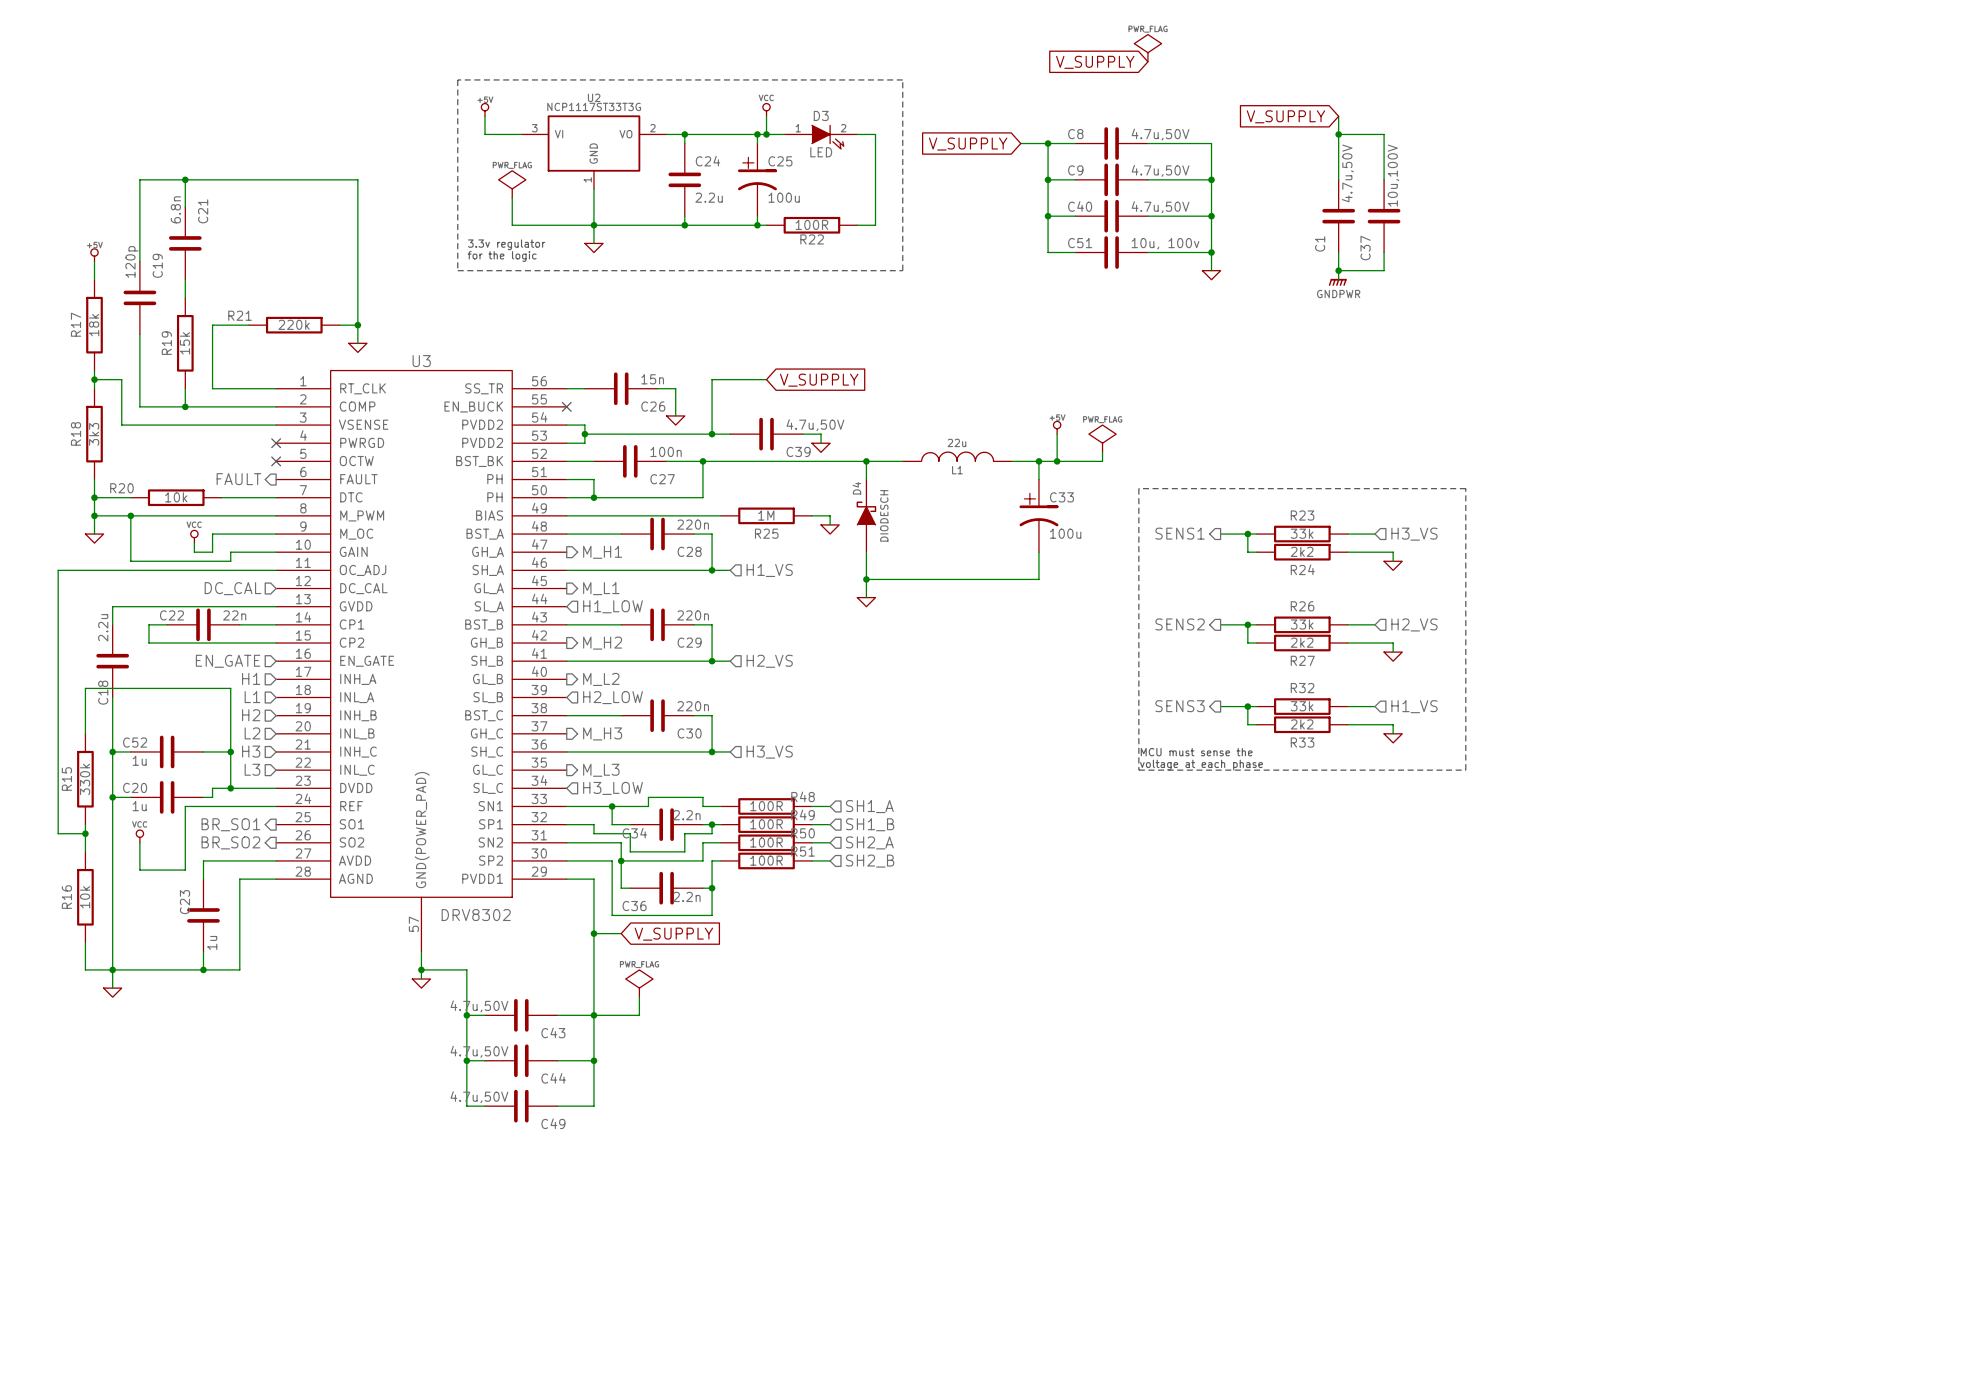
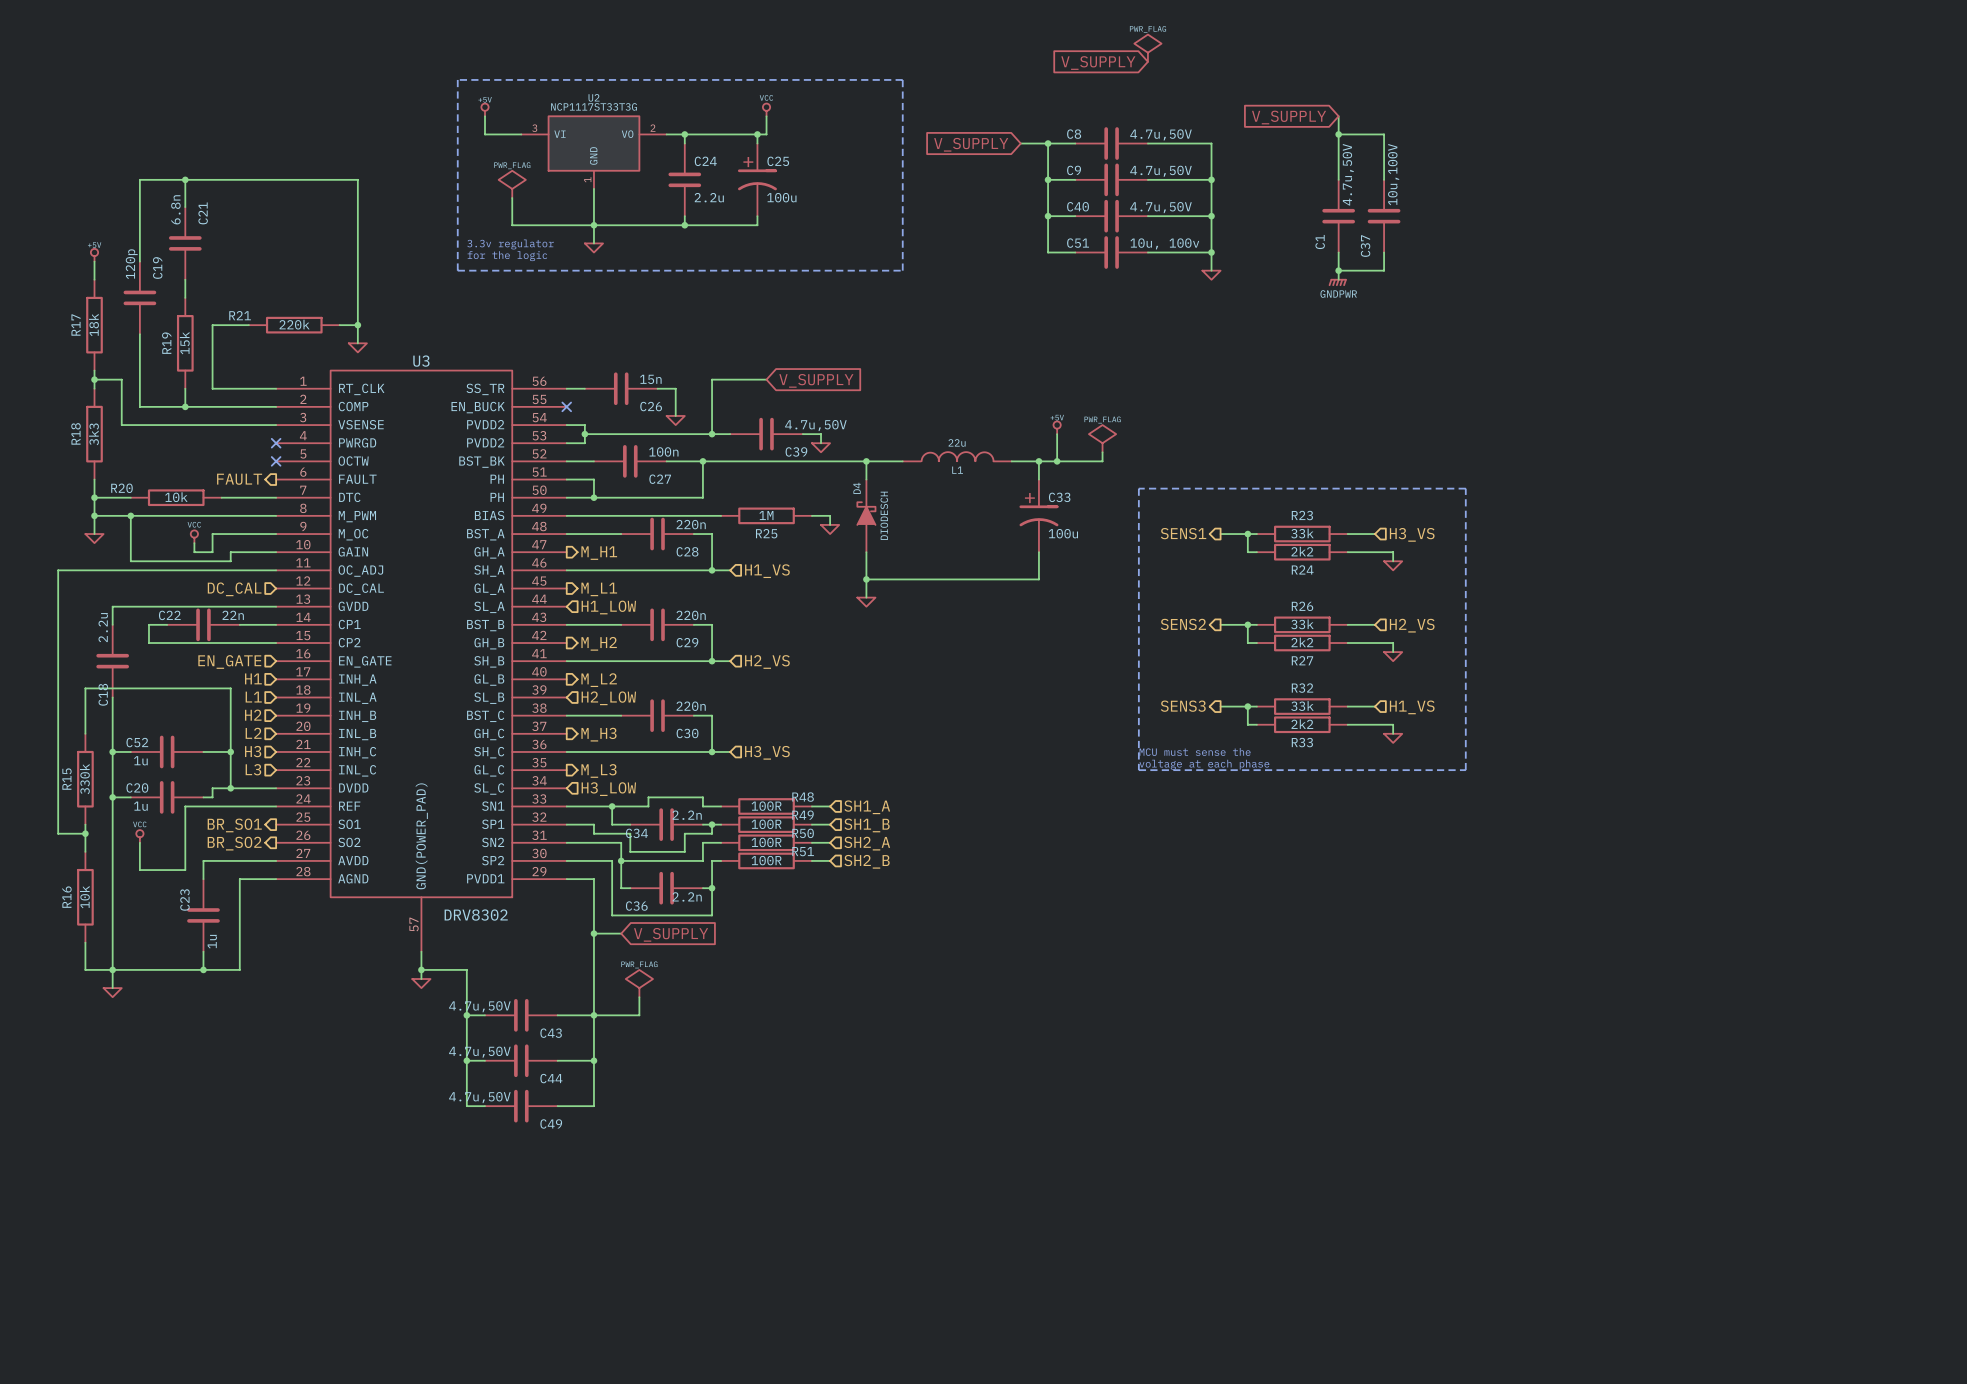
wire: (766, 134) (784, 134) -> none
junction: (766, 134) -> none
wire: (857, 134) (875, 134) (875, 225) (857, 225) -> none
D3: LED (821, 137) -> none
wire: (757, 225) (766, 225) -> none
junction: (757, 225) -> none
R22: 100R (811, 225) -> none

